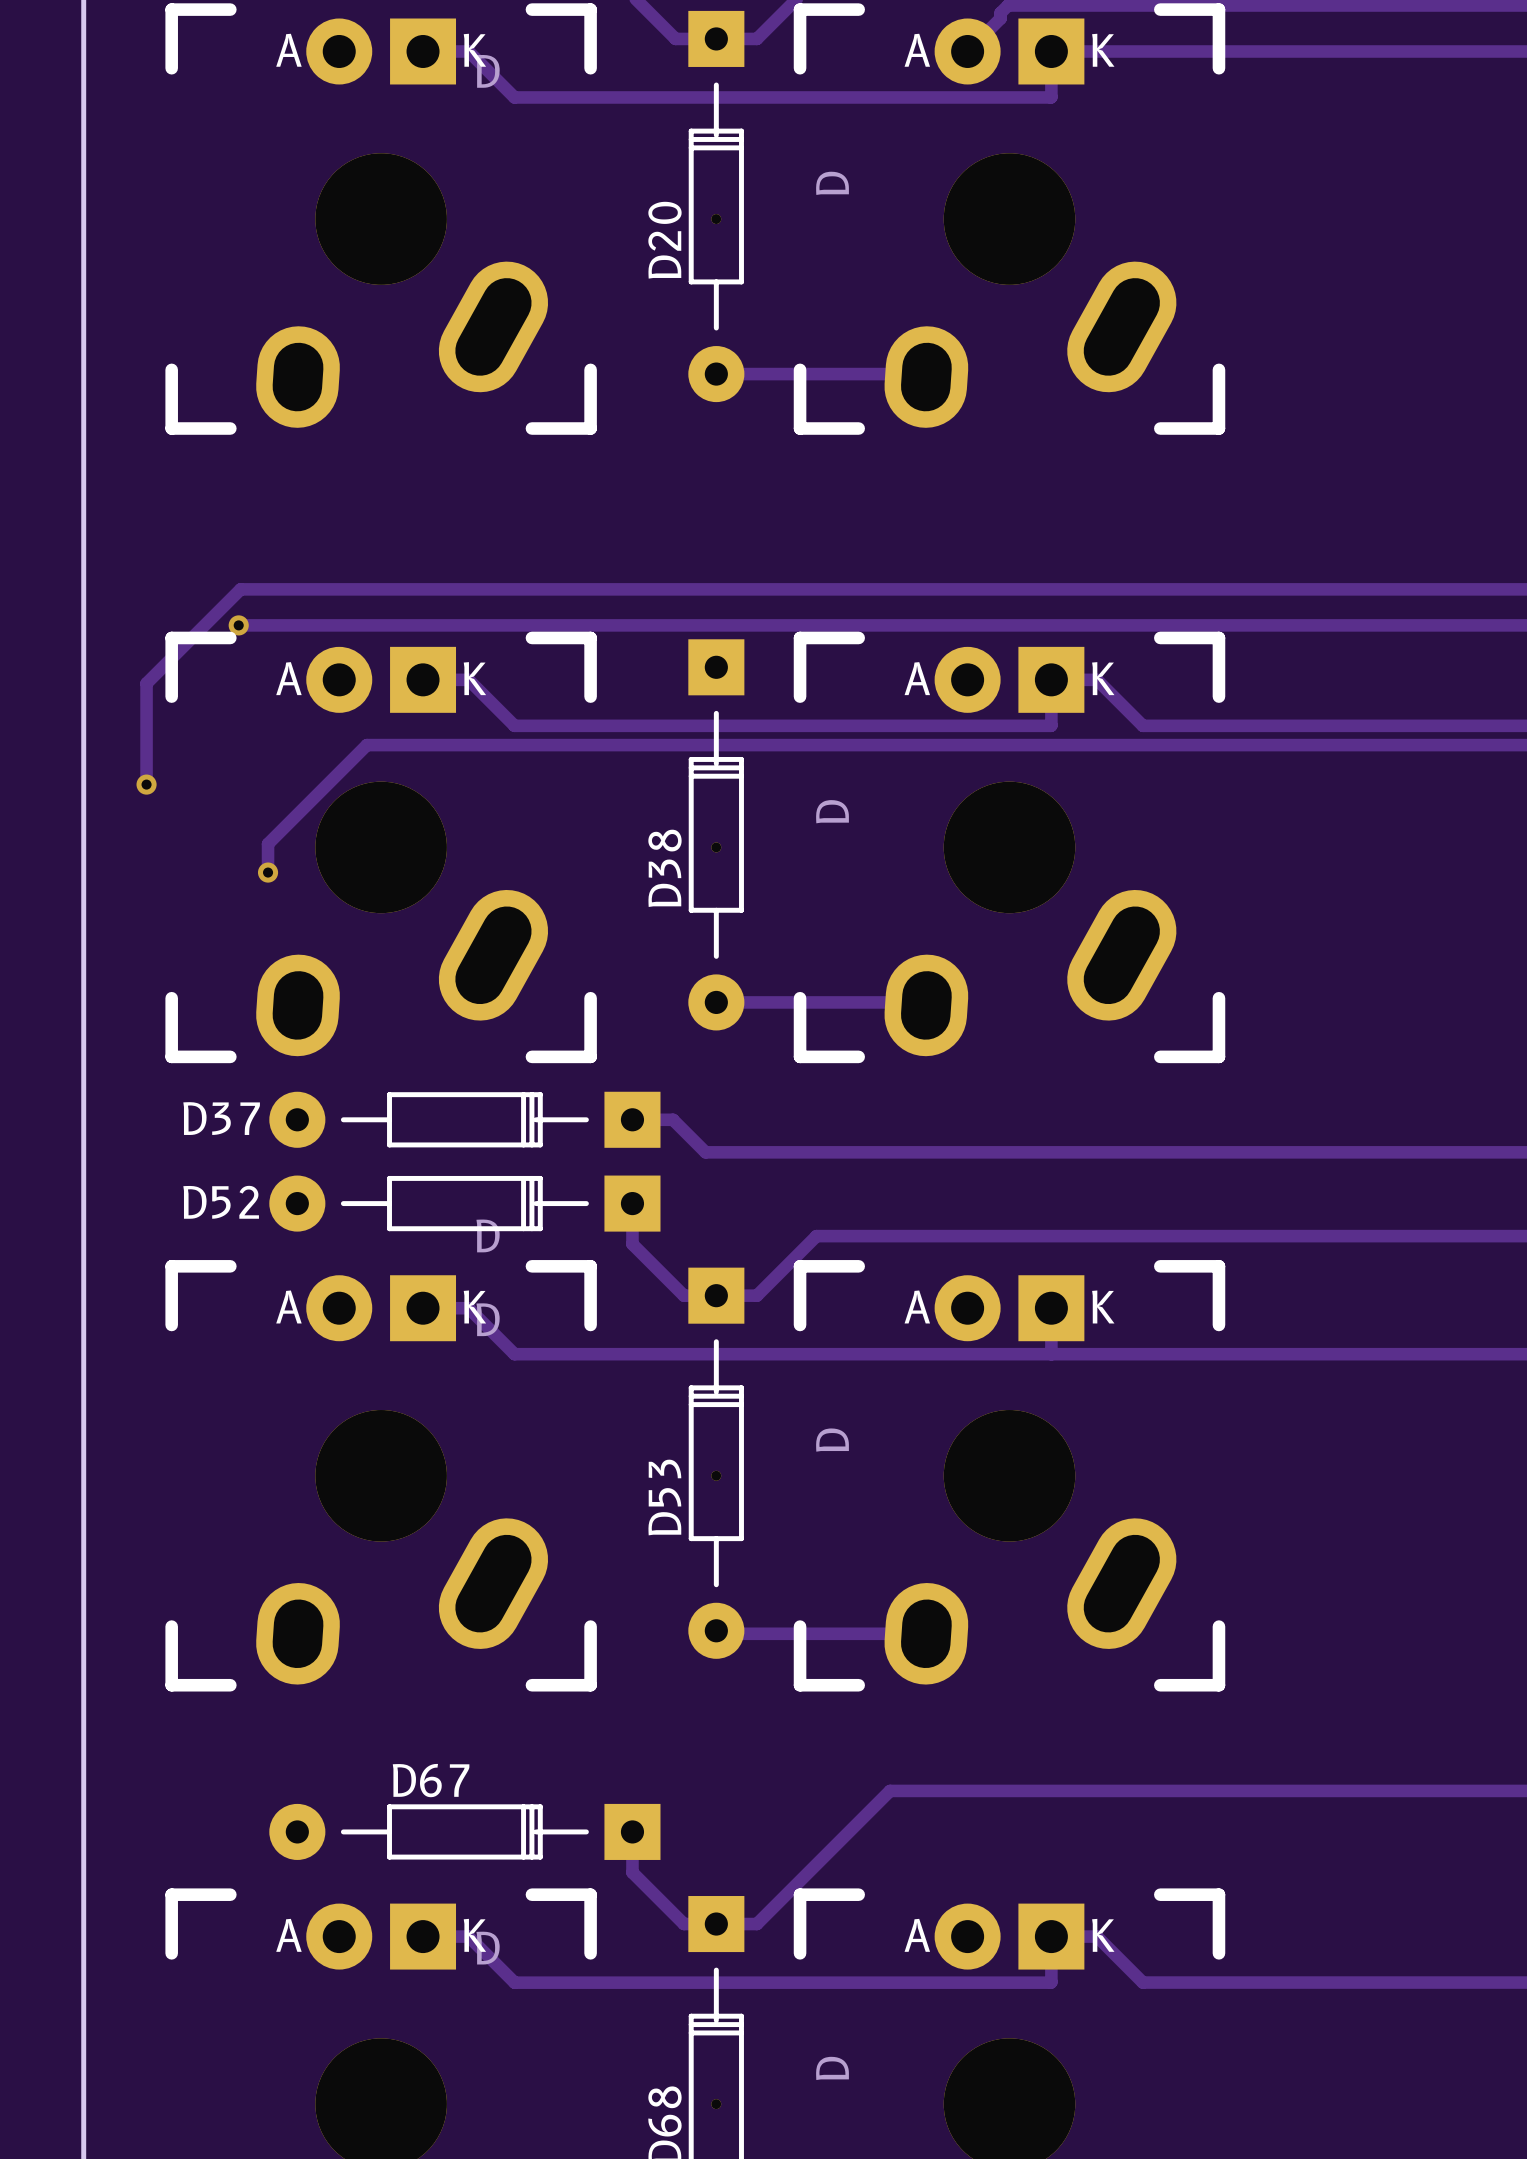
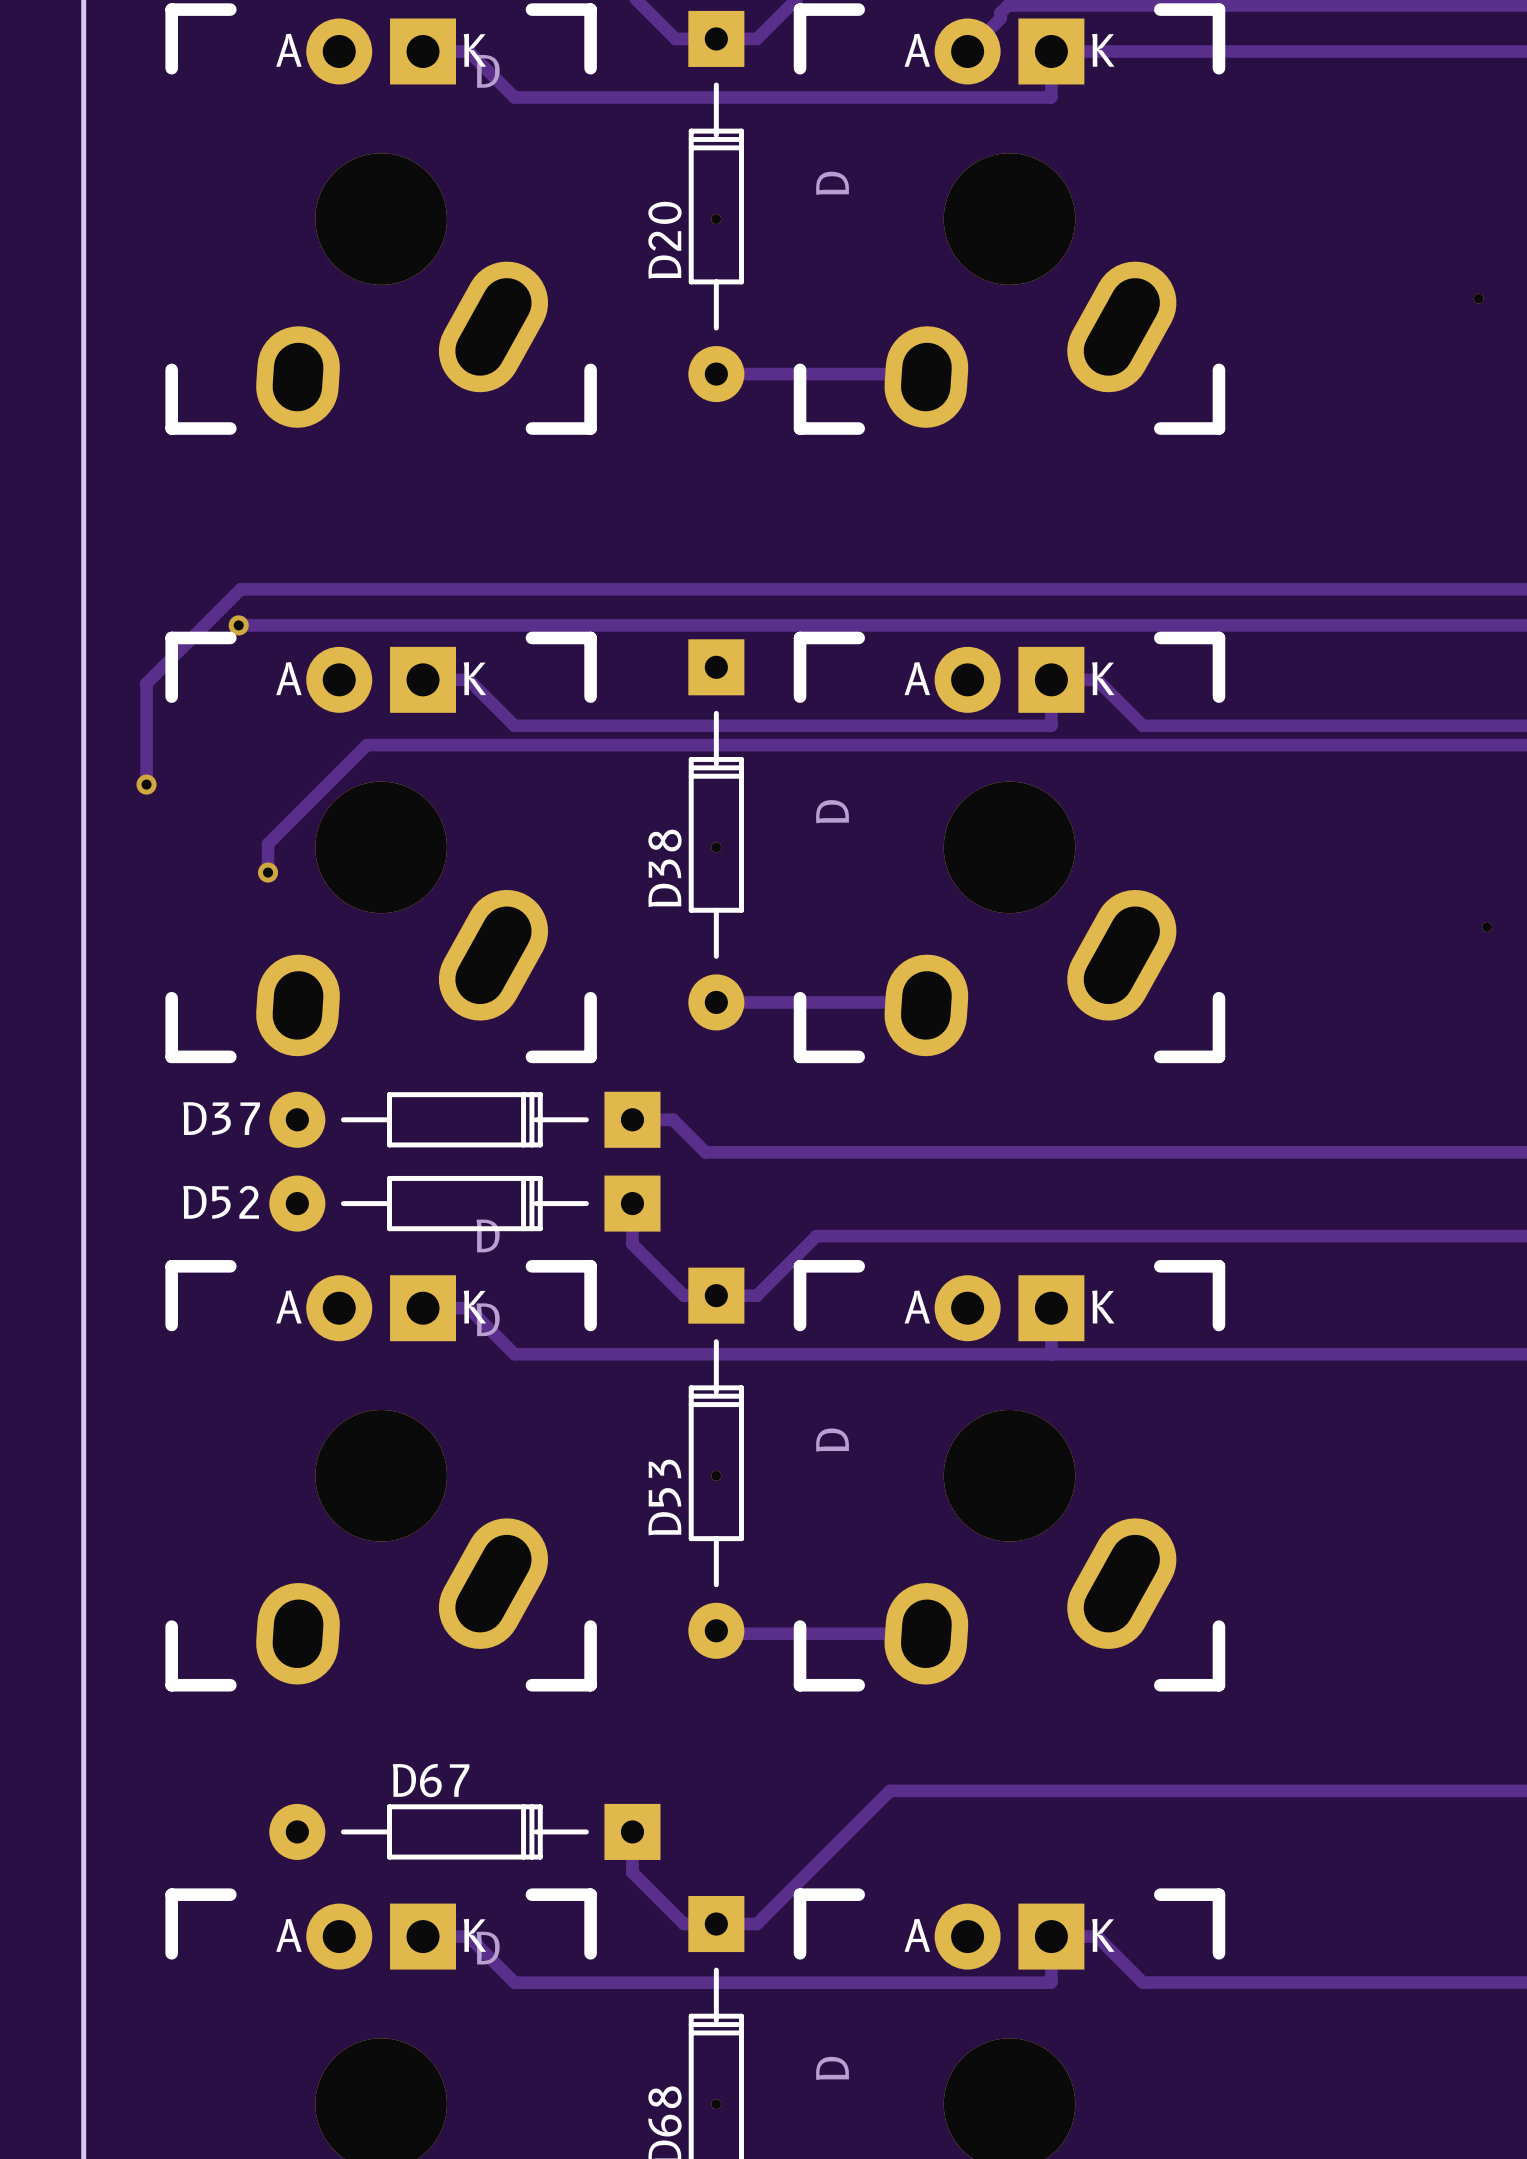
part: none -> (1478, 298)
part: none -> (1487, 927)

